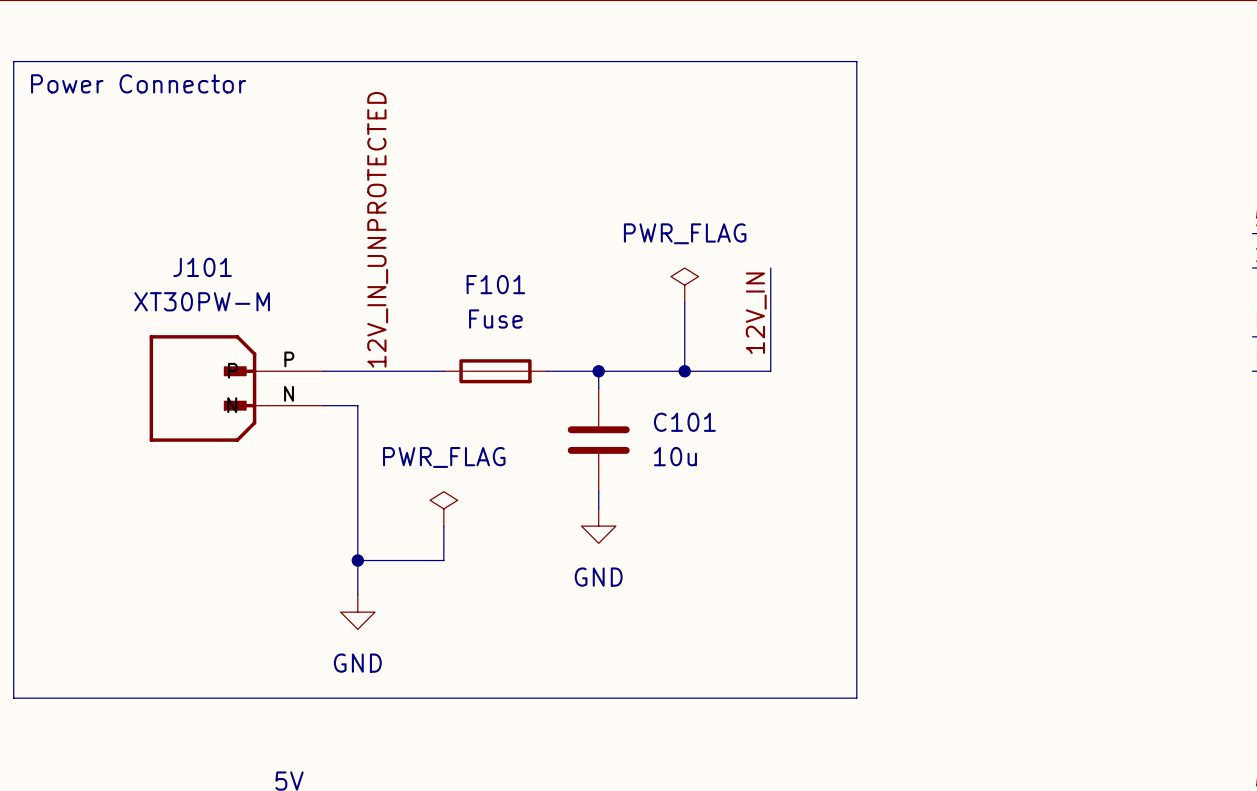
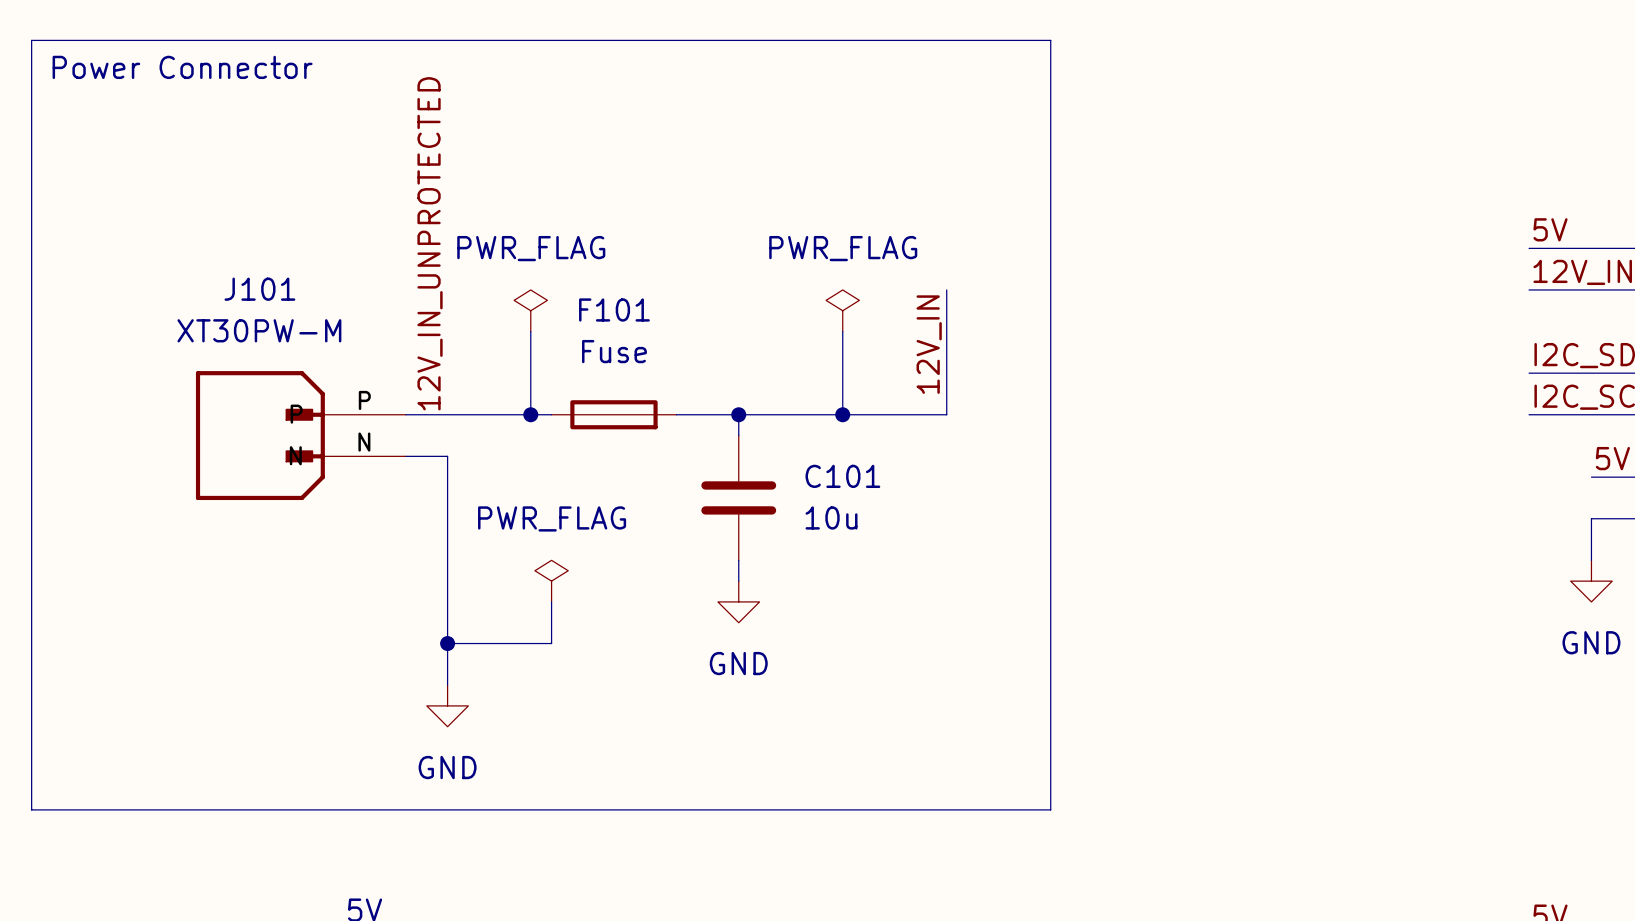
label position: 12V_IN_UNPROTECTED (377, 229) -> 12V_IN_UNPROTECTED (430, 243)
power symbol: none -> PWR_FLAG (530, 310)
wire: none -> (530, 331) (530, 414)
junction: none -> (530, 414)

